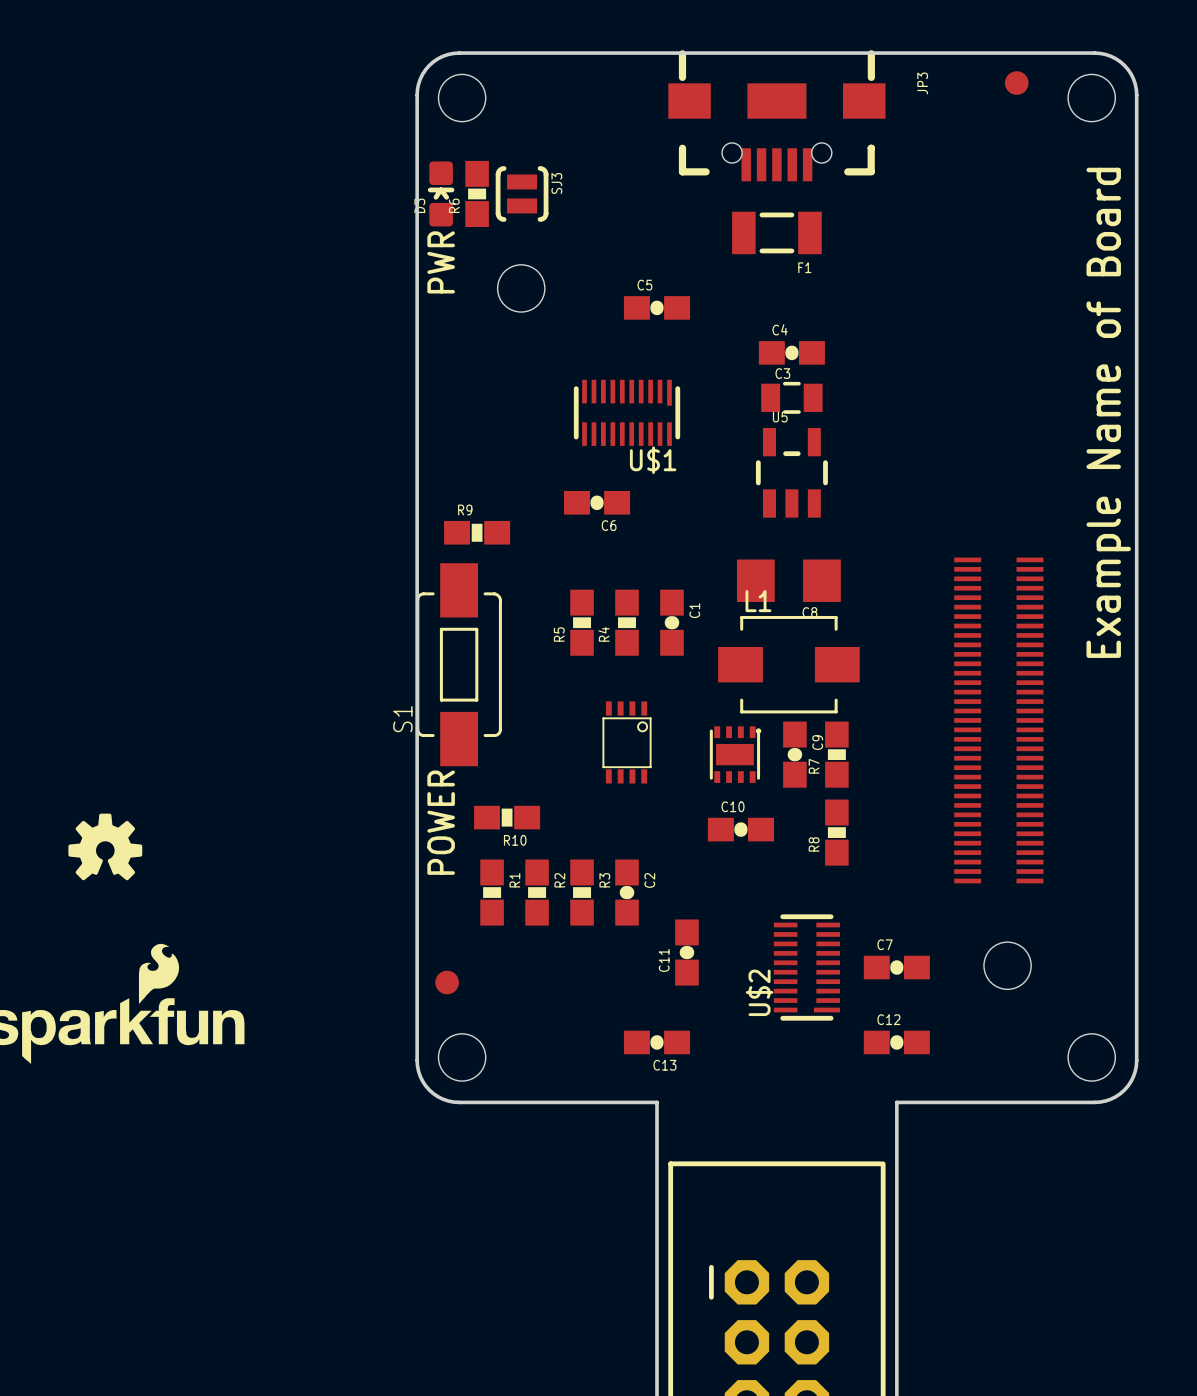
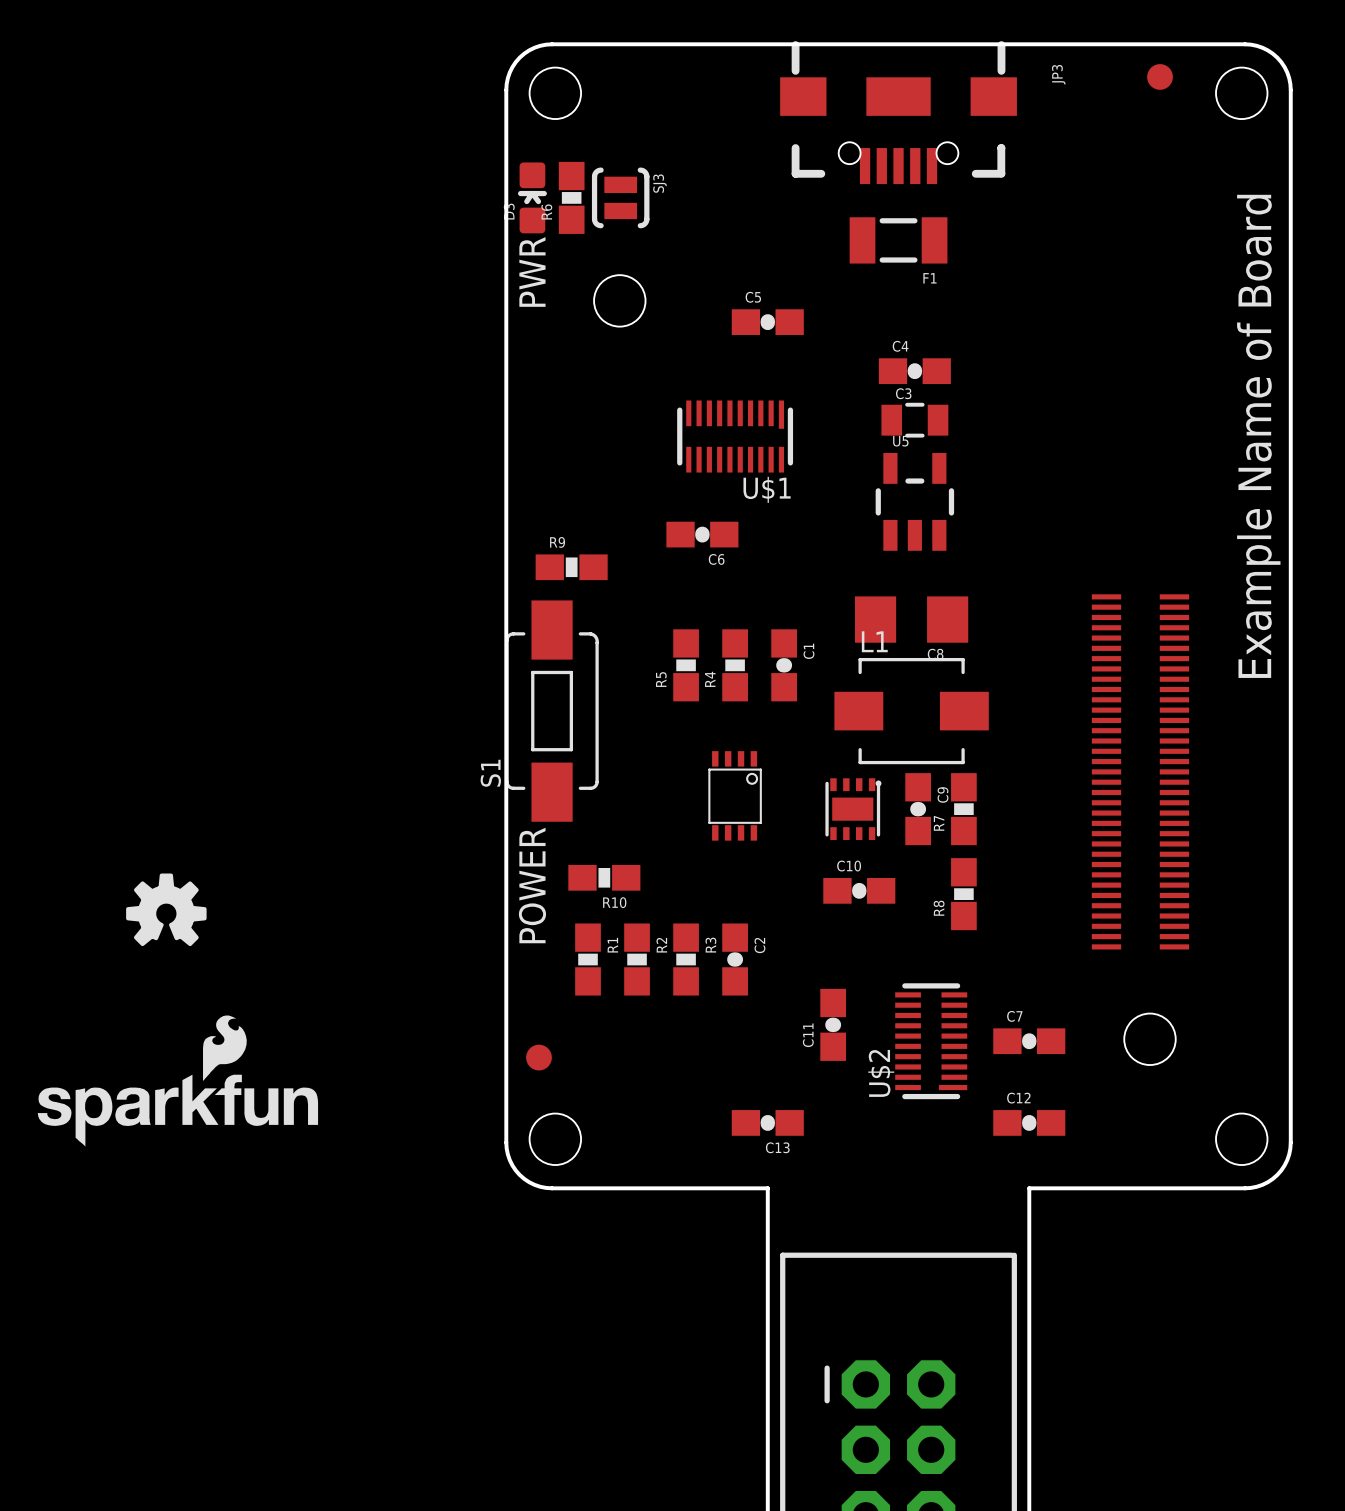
C11 position: (686, 952) -> (833, 1024)

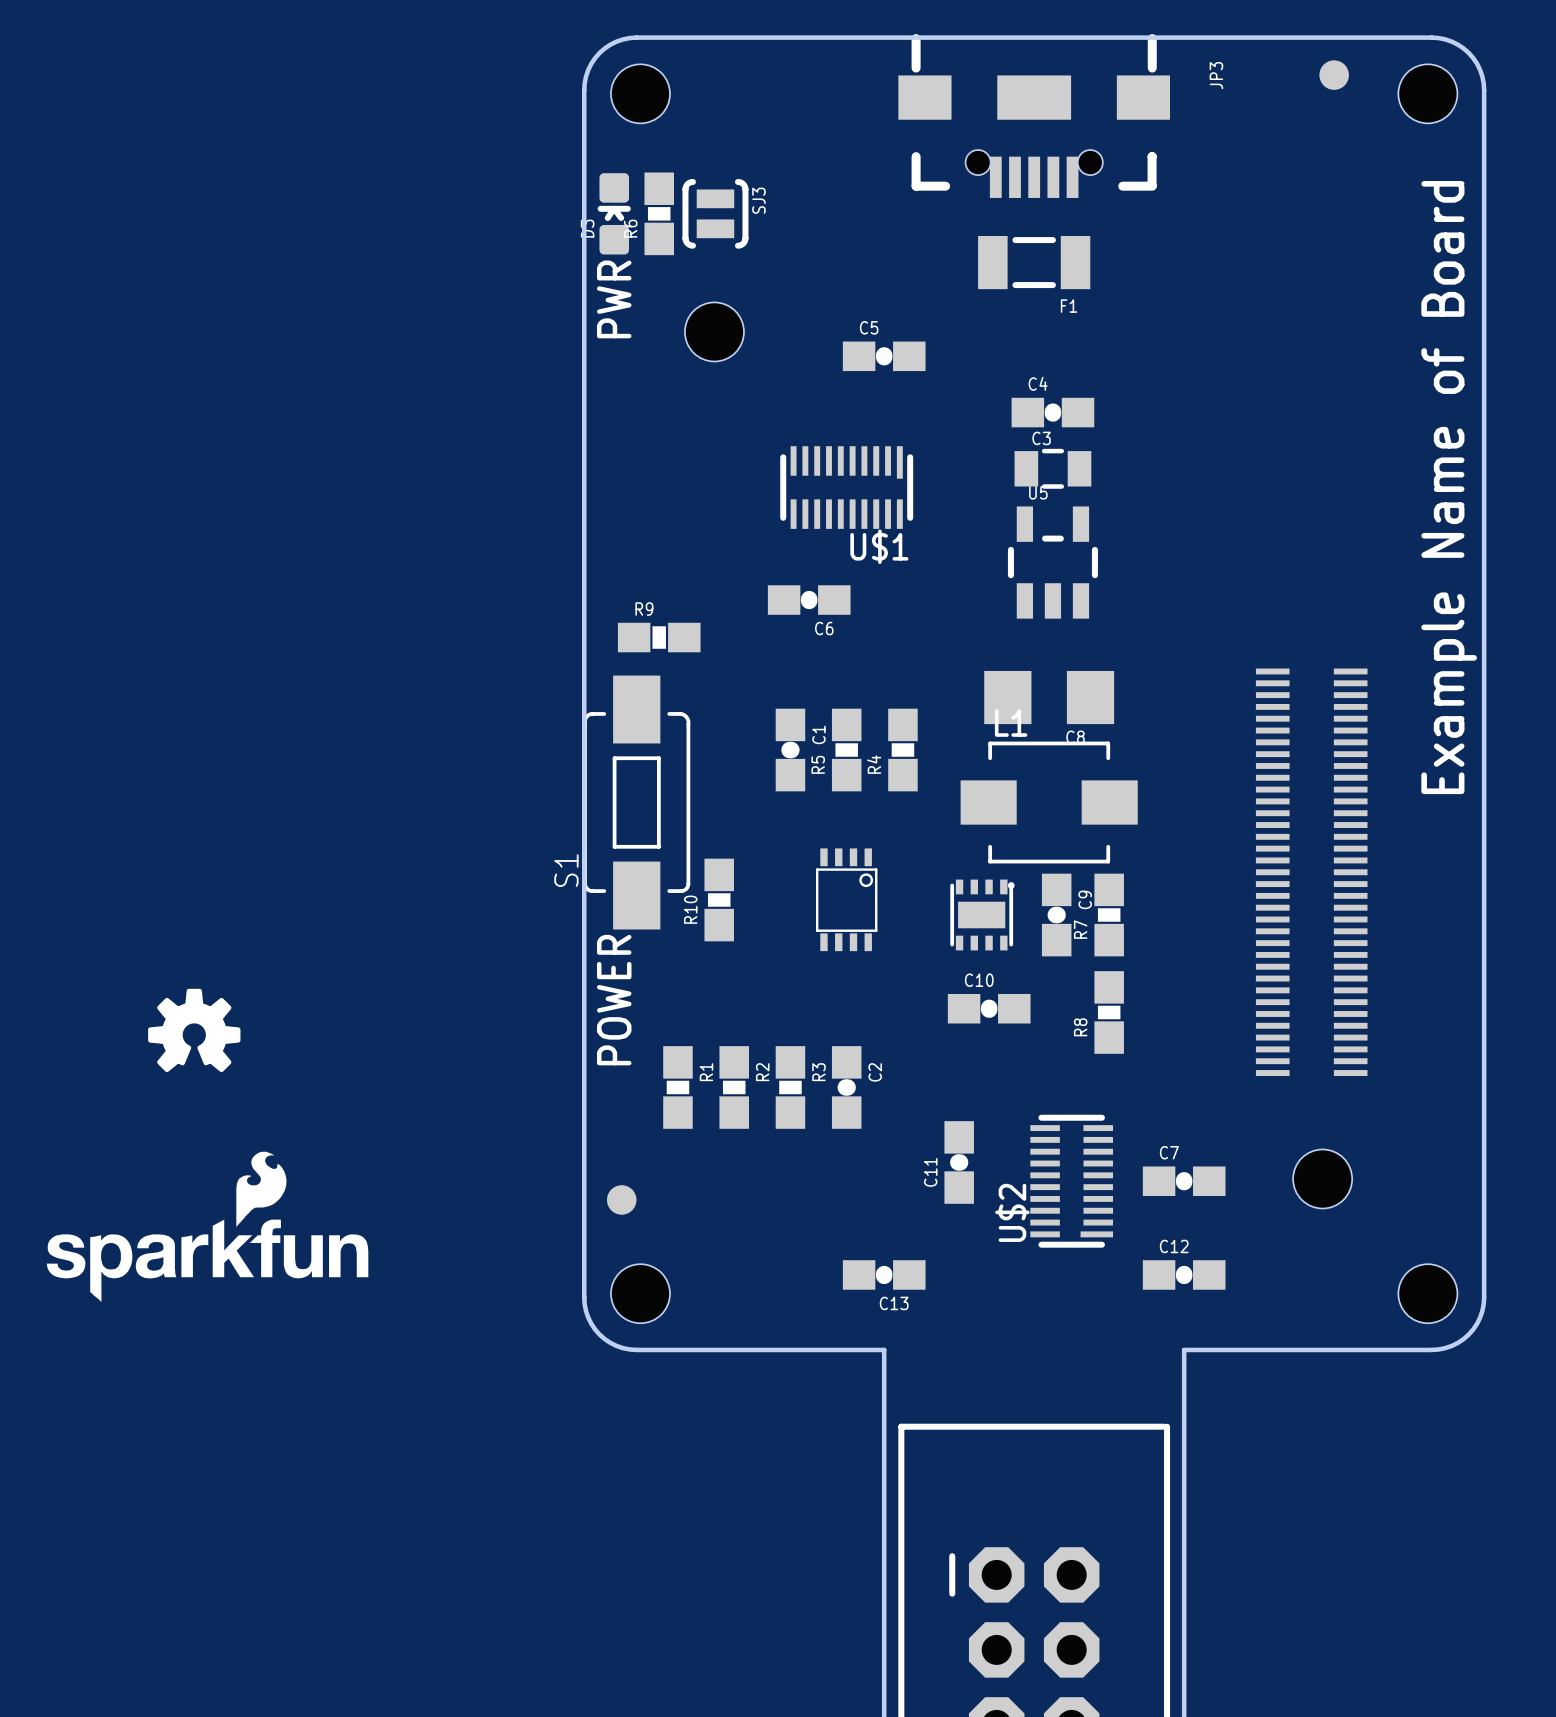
R5: (686, 665) -> none
C1 position: (784, 665) -> (790, 750)
R4: none -> (902, 750)
R4 name: R4 (710, 679) -> R5 (818, 764)
R10 rotation: 0° (604, 877) -> 90° clockwise (719, 900)
R10 position: (604, 877) -> (719, 900)

